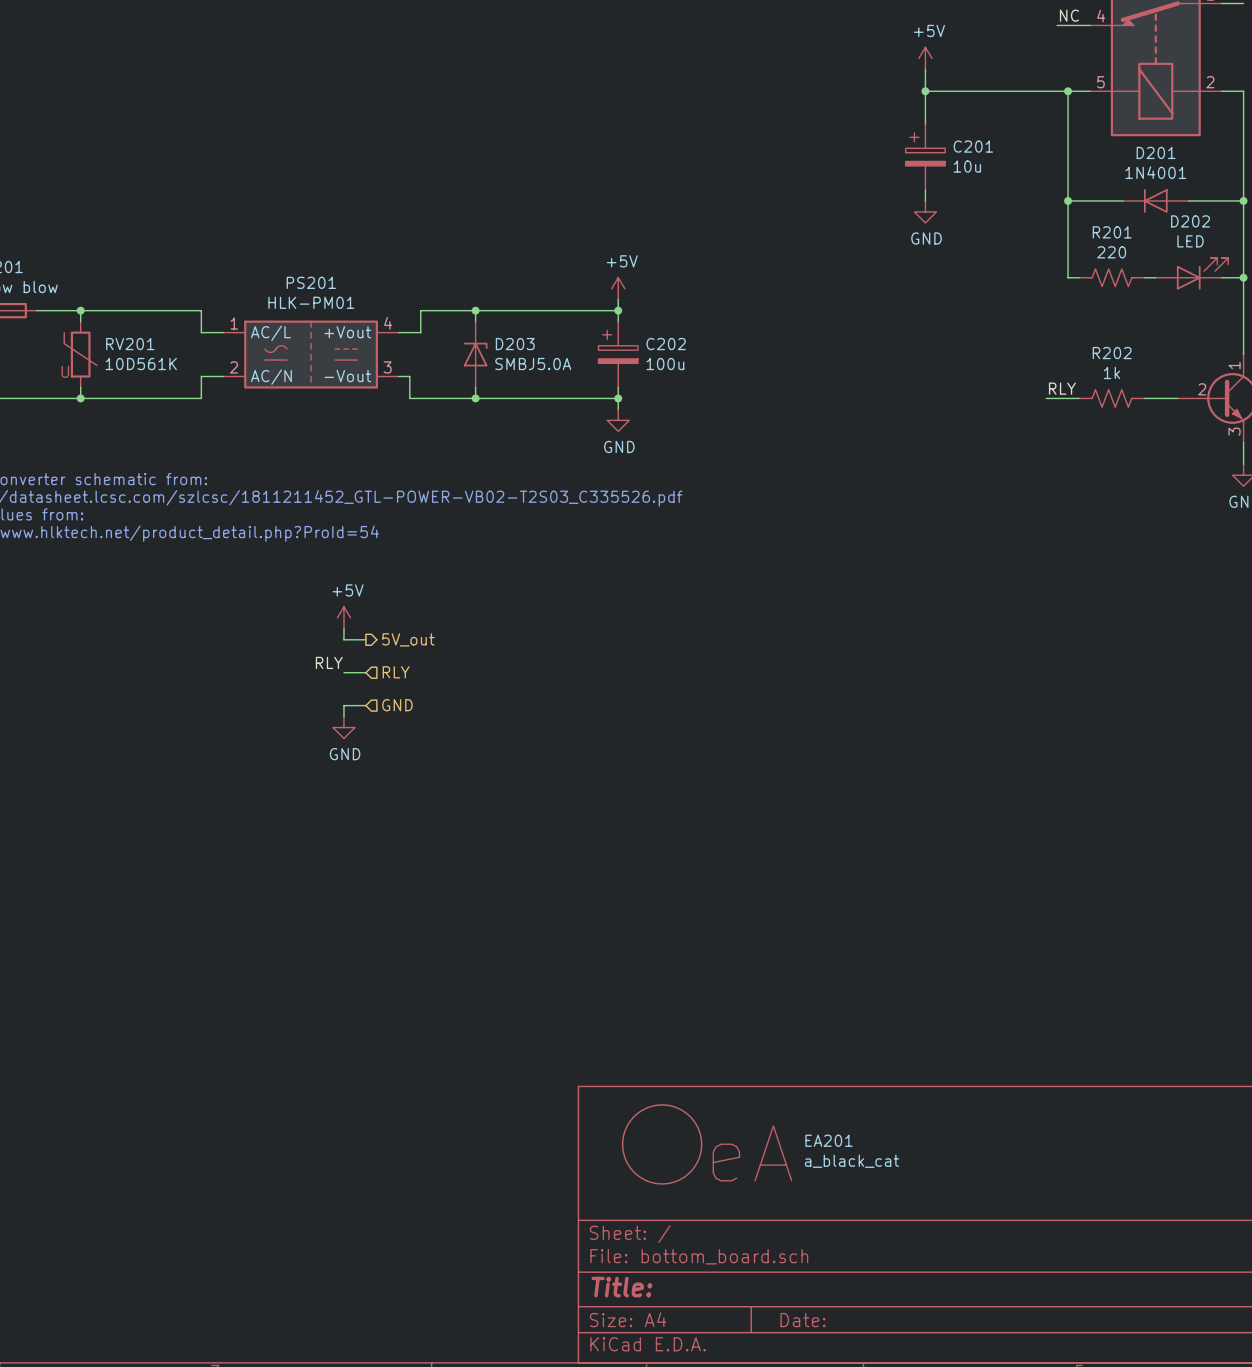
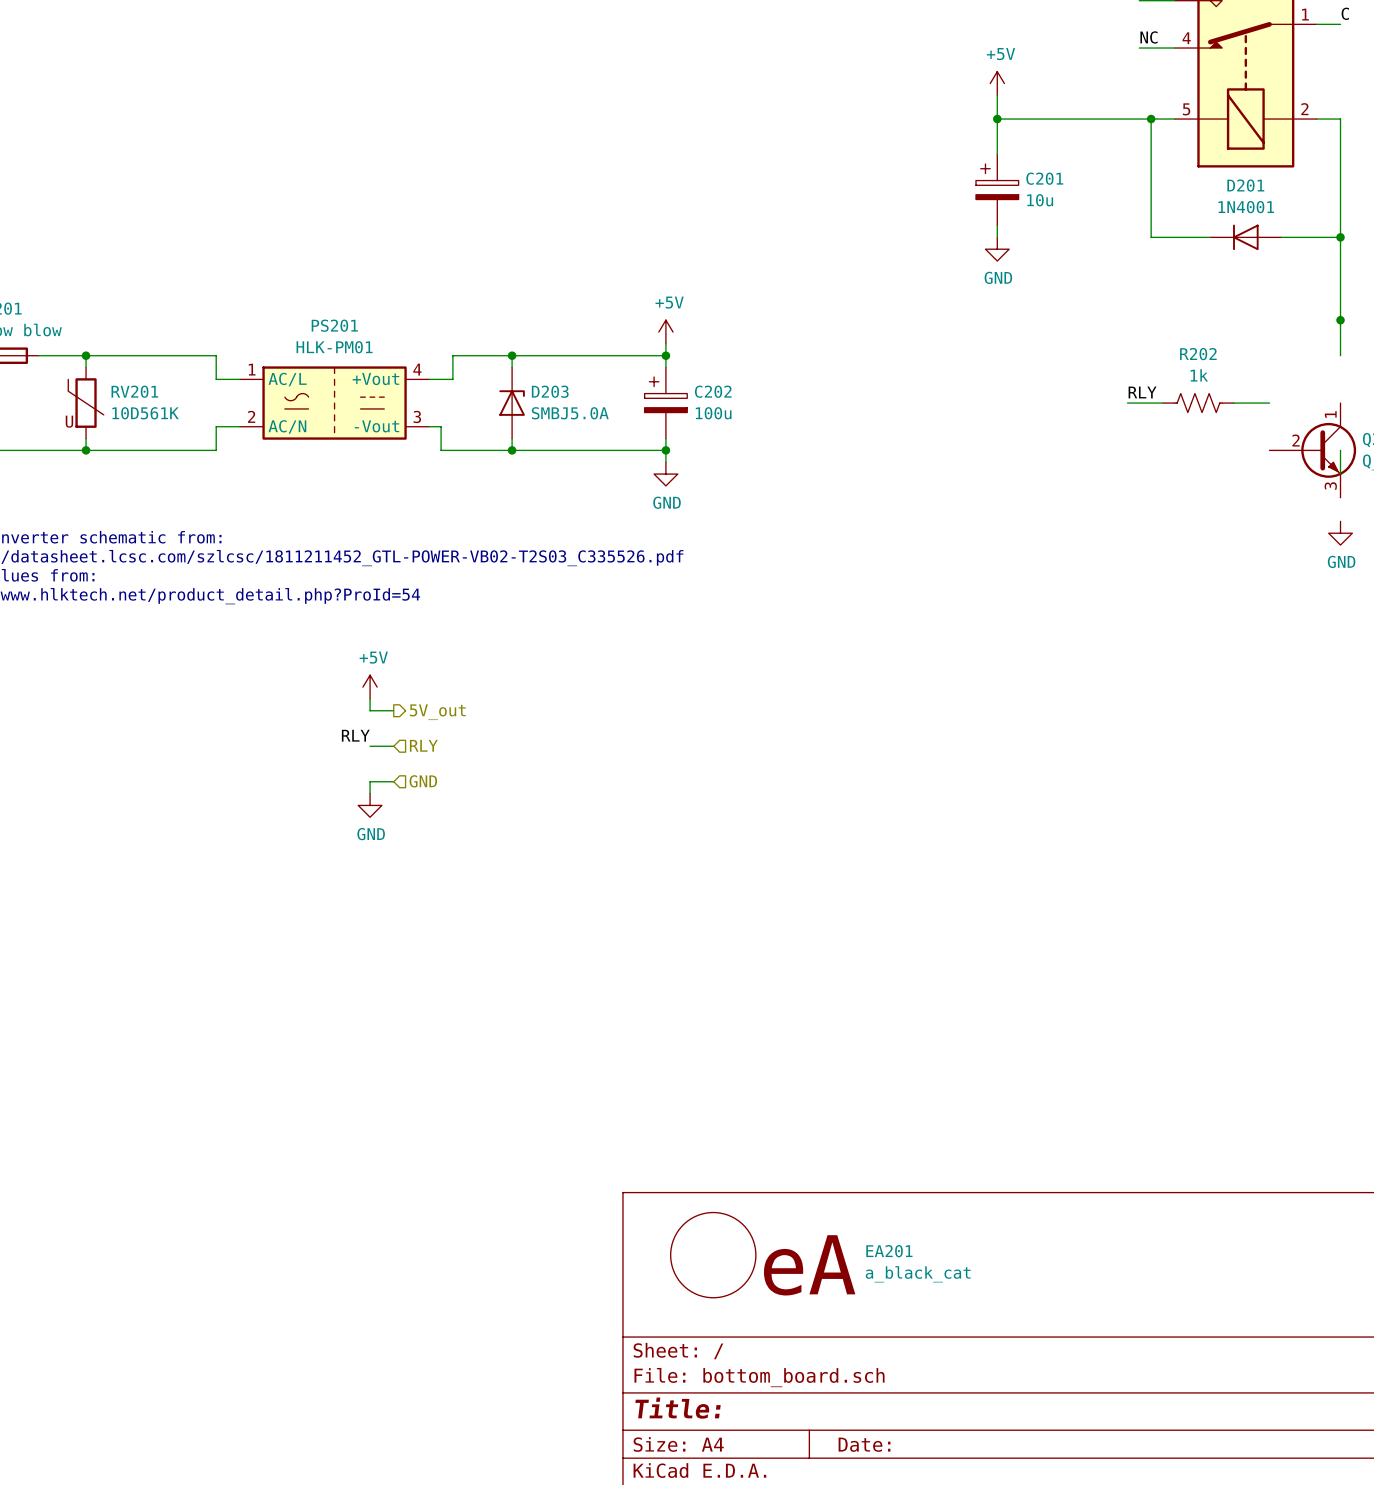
wire: (1068, 200) (1068, 277) (1079, 277) -> none
junction: (1068, 200) -> none
D202: LED (1192, 273) -> none
R201: 220 (1111, 277) -> none
wire: (1144, 277) (1155, 277) -> none
wire: (1221, 277) (1243, 277) -> none
wire: (1243, 310) (1243, 354) -> none
label position: RLY (1062, 388) -> RLY (1142, 392)
wire: (1046, 398) (1079, 398) -> (1127, 403) (1162, 403)
R202 position: (1111, 398) -> (1198, 403)
wire: (1144, 398) (1177, 398) -> (1233, 403) (1269, 403)
wire: (1243, 442) (1243, 464) -> (1340, 450) (1340, 474)

